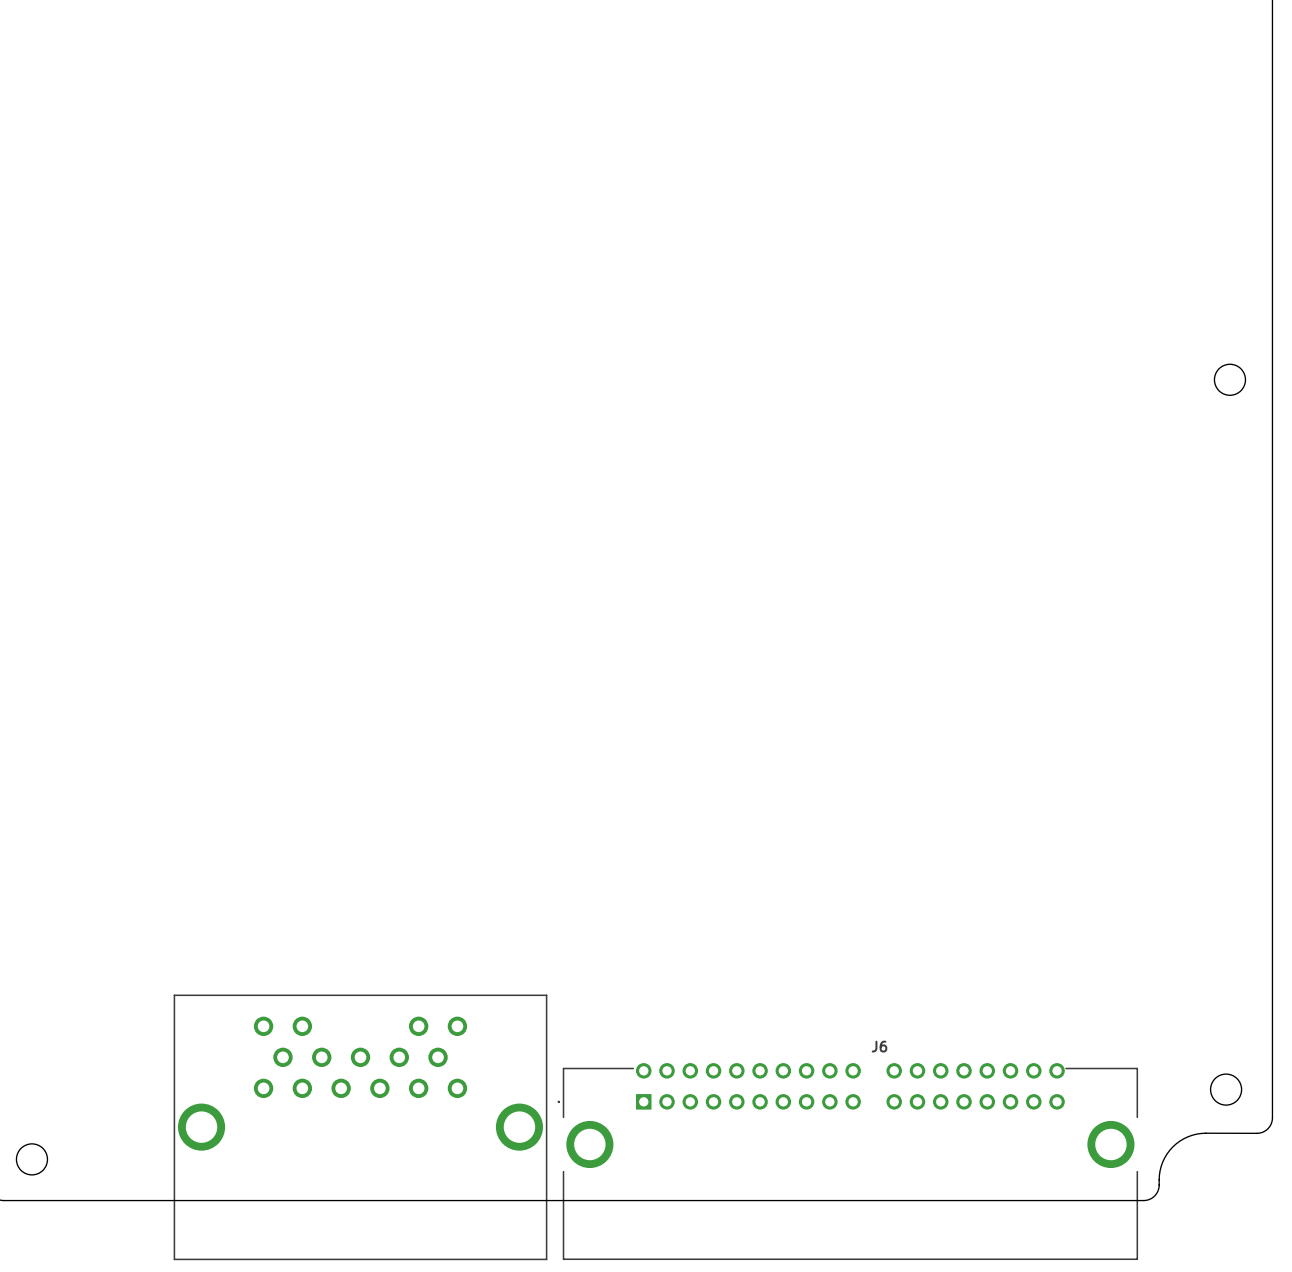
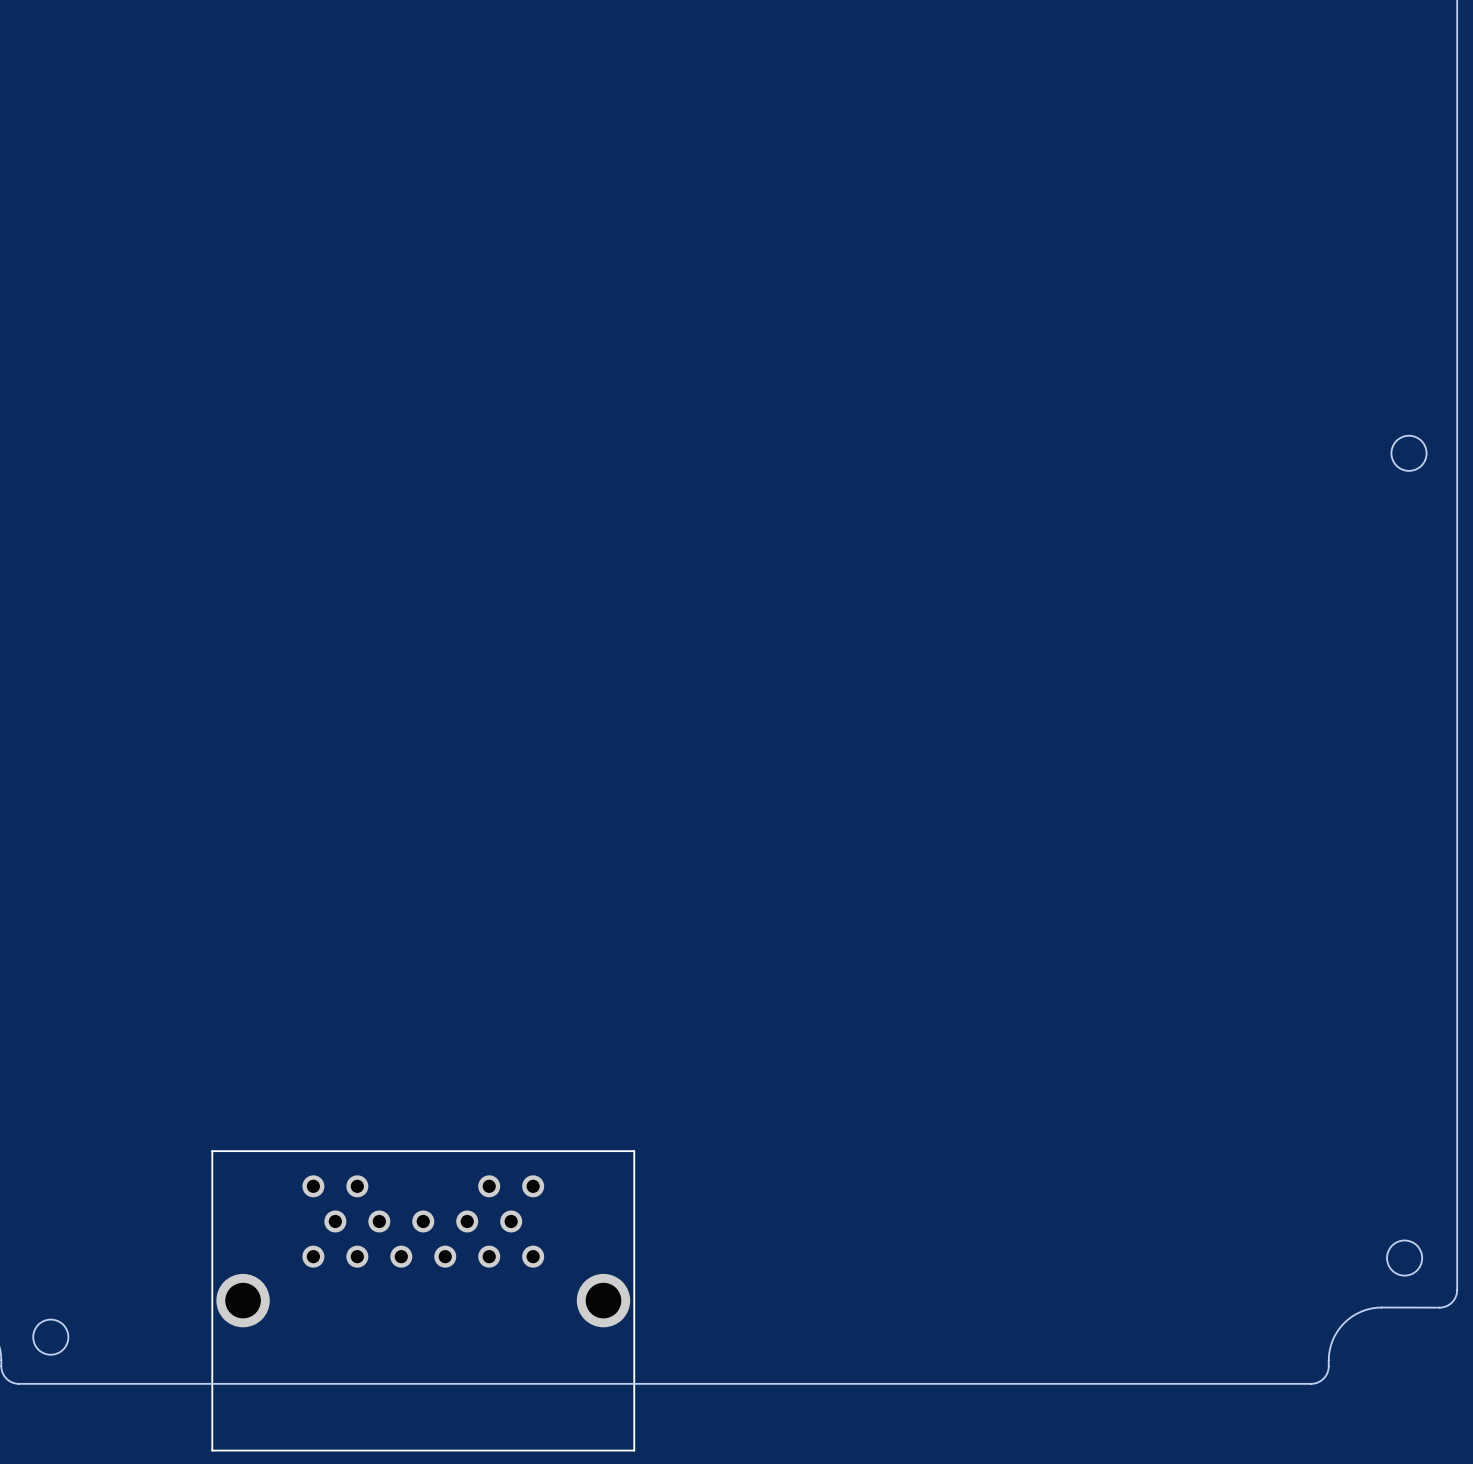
J6: (847, 1161) -> none

